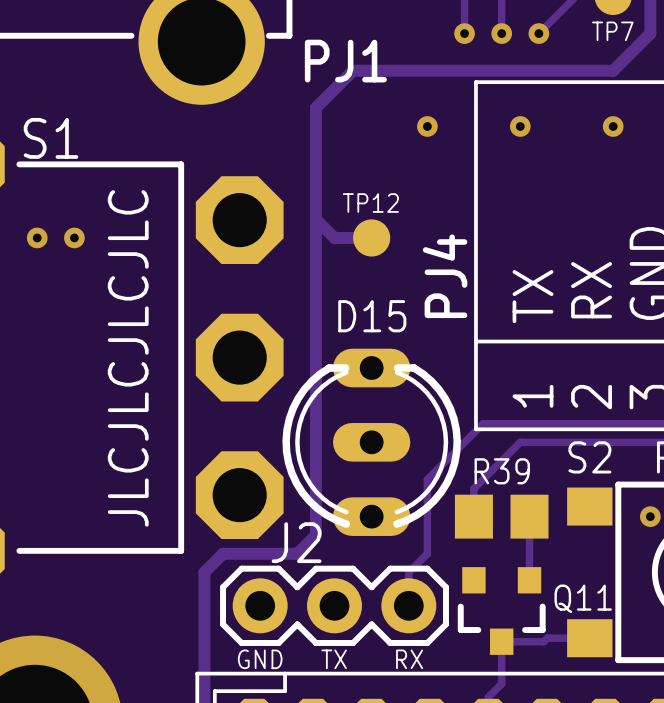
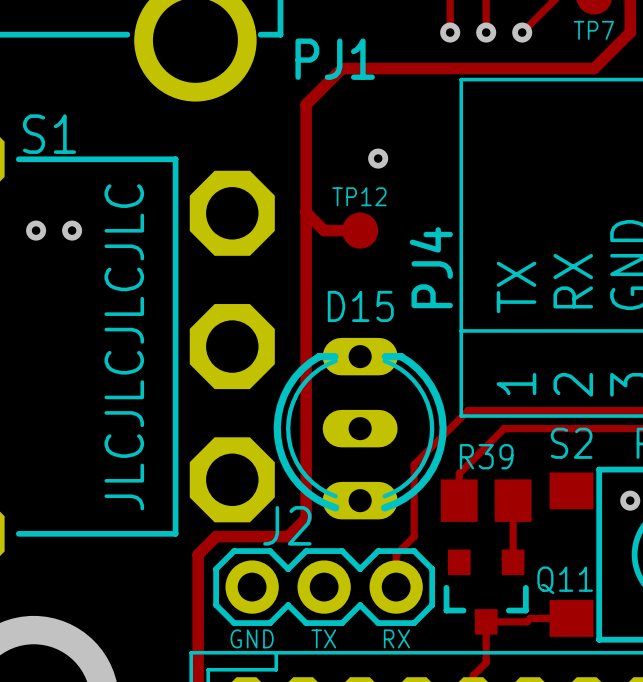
via position: (427, 126) -> (378, 158)
via: (520, 126) -> none
via: (613, 126) -> none

